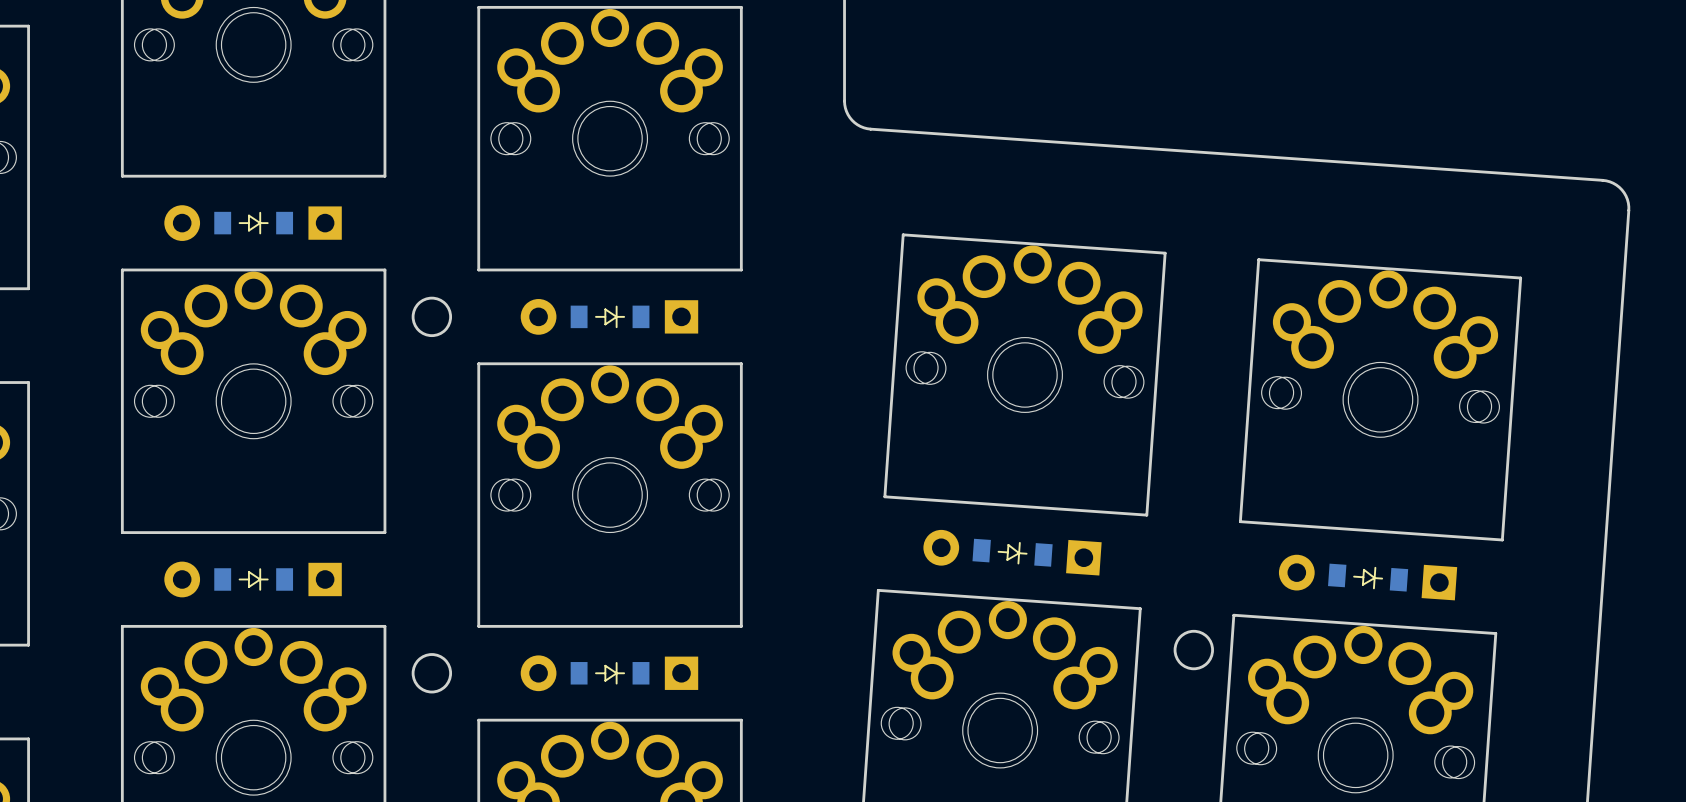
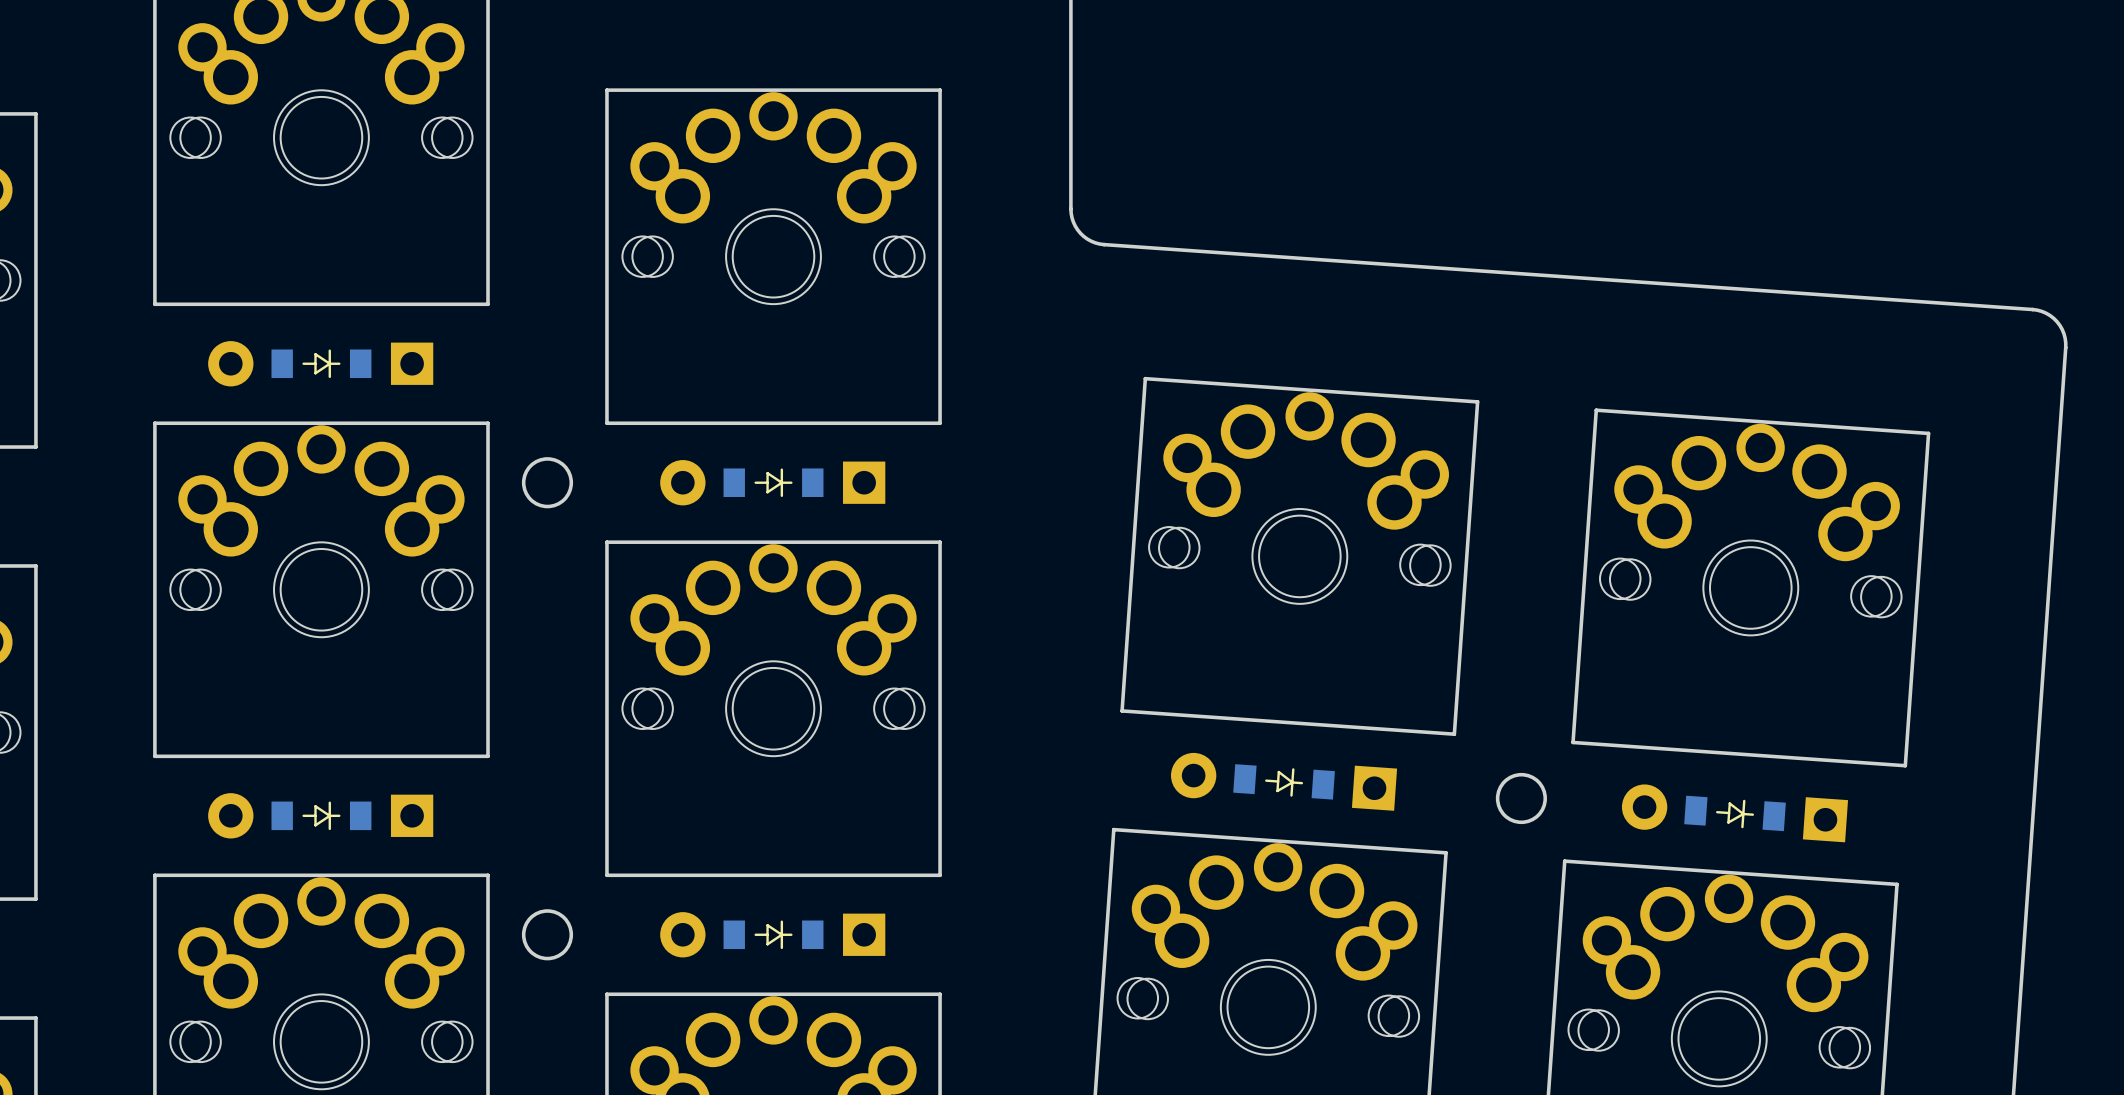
round board edge position: (1193, 650) -> (1521, 798)

